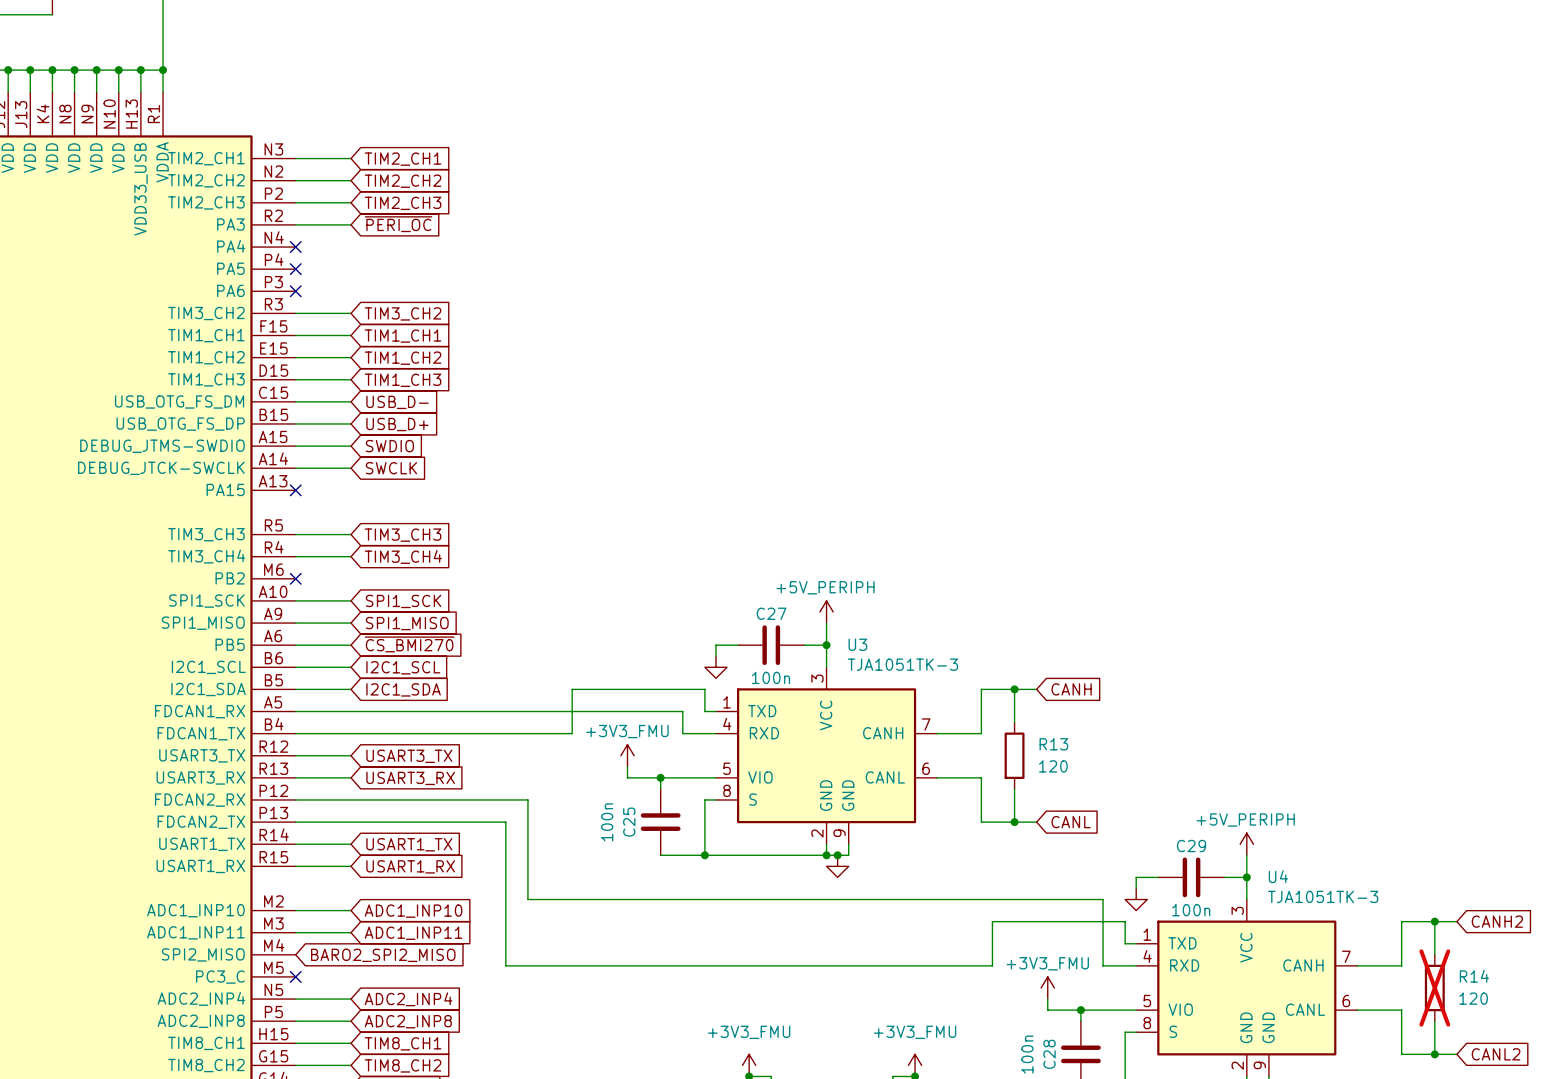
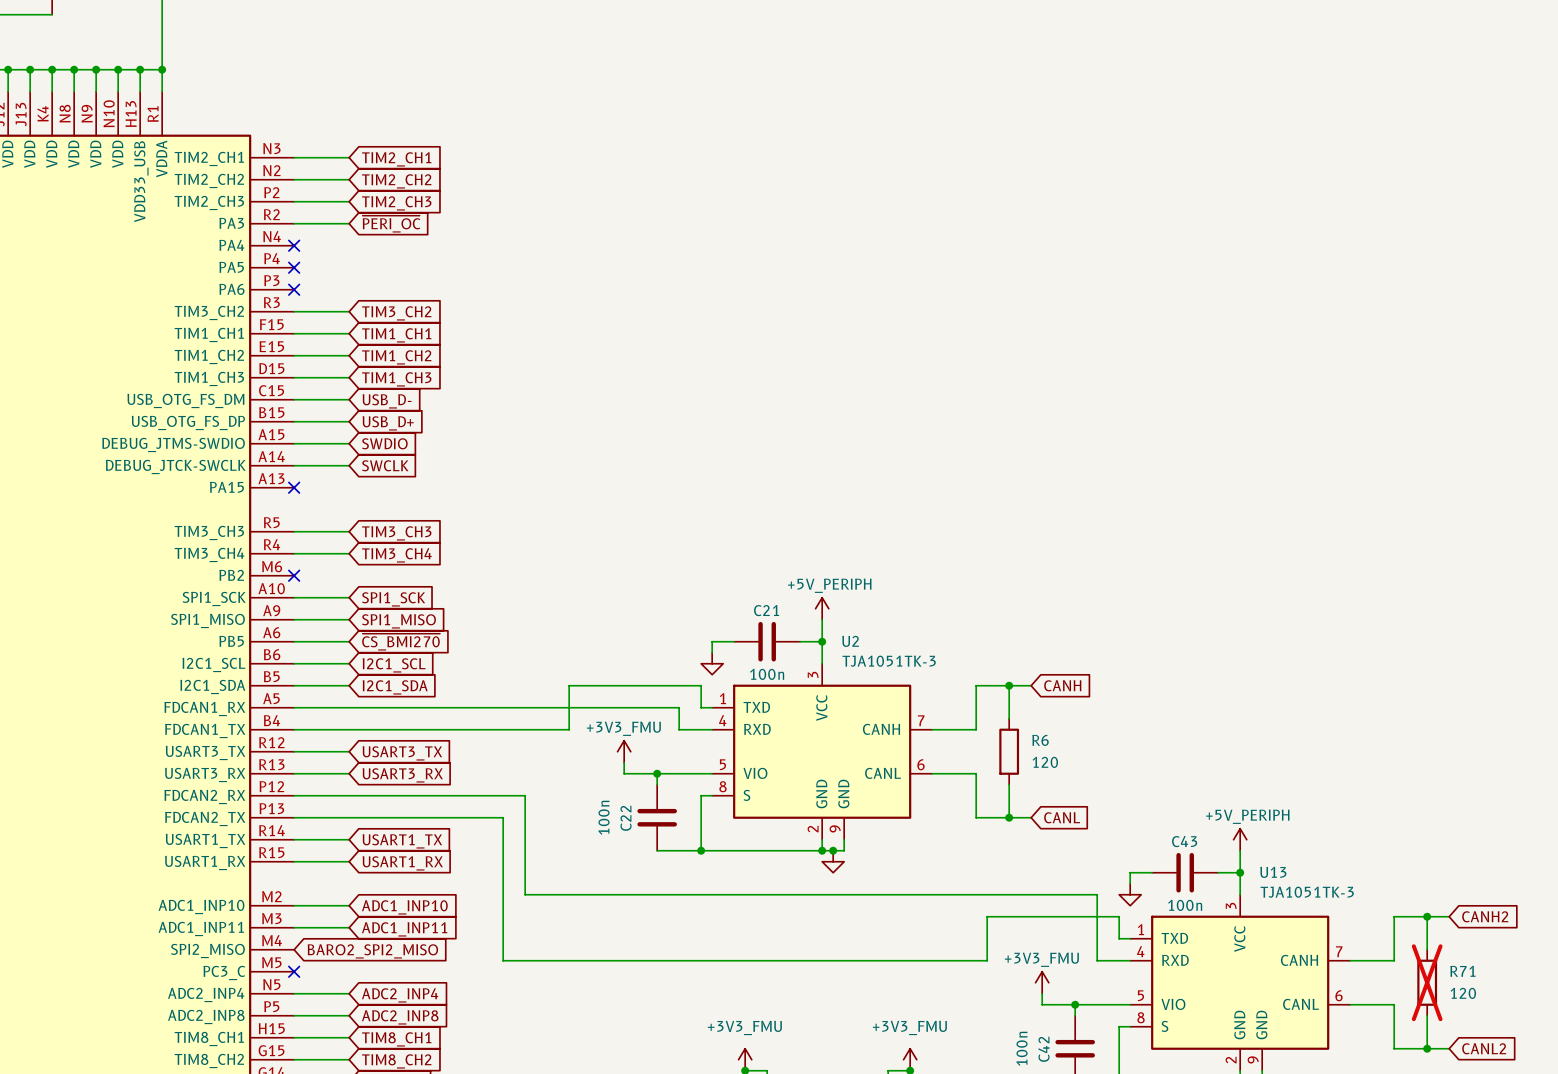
C27 name: C27 (771, 613) -> C21 (766, 610)
U3 name: U3 (857, 644) -> U2 (850, 641)
R13 name: R13 (1053, 744) -> R6 (1040, 740)
C25 name: C25 (629, 822) -> C22 (626, 818)
C29 name: C29 (1191, 846) -> C43 (1184, 841)
U4 name: U4 (1278, 876) -> U13 (1273, 872)
R14 name: R14 (1474, 976) -> R71 (1462, 971)
C28 name: C28 (1049, 1054) -> C42 (1044, 1049)

